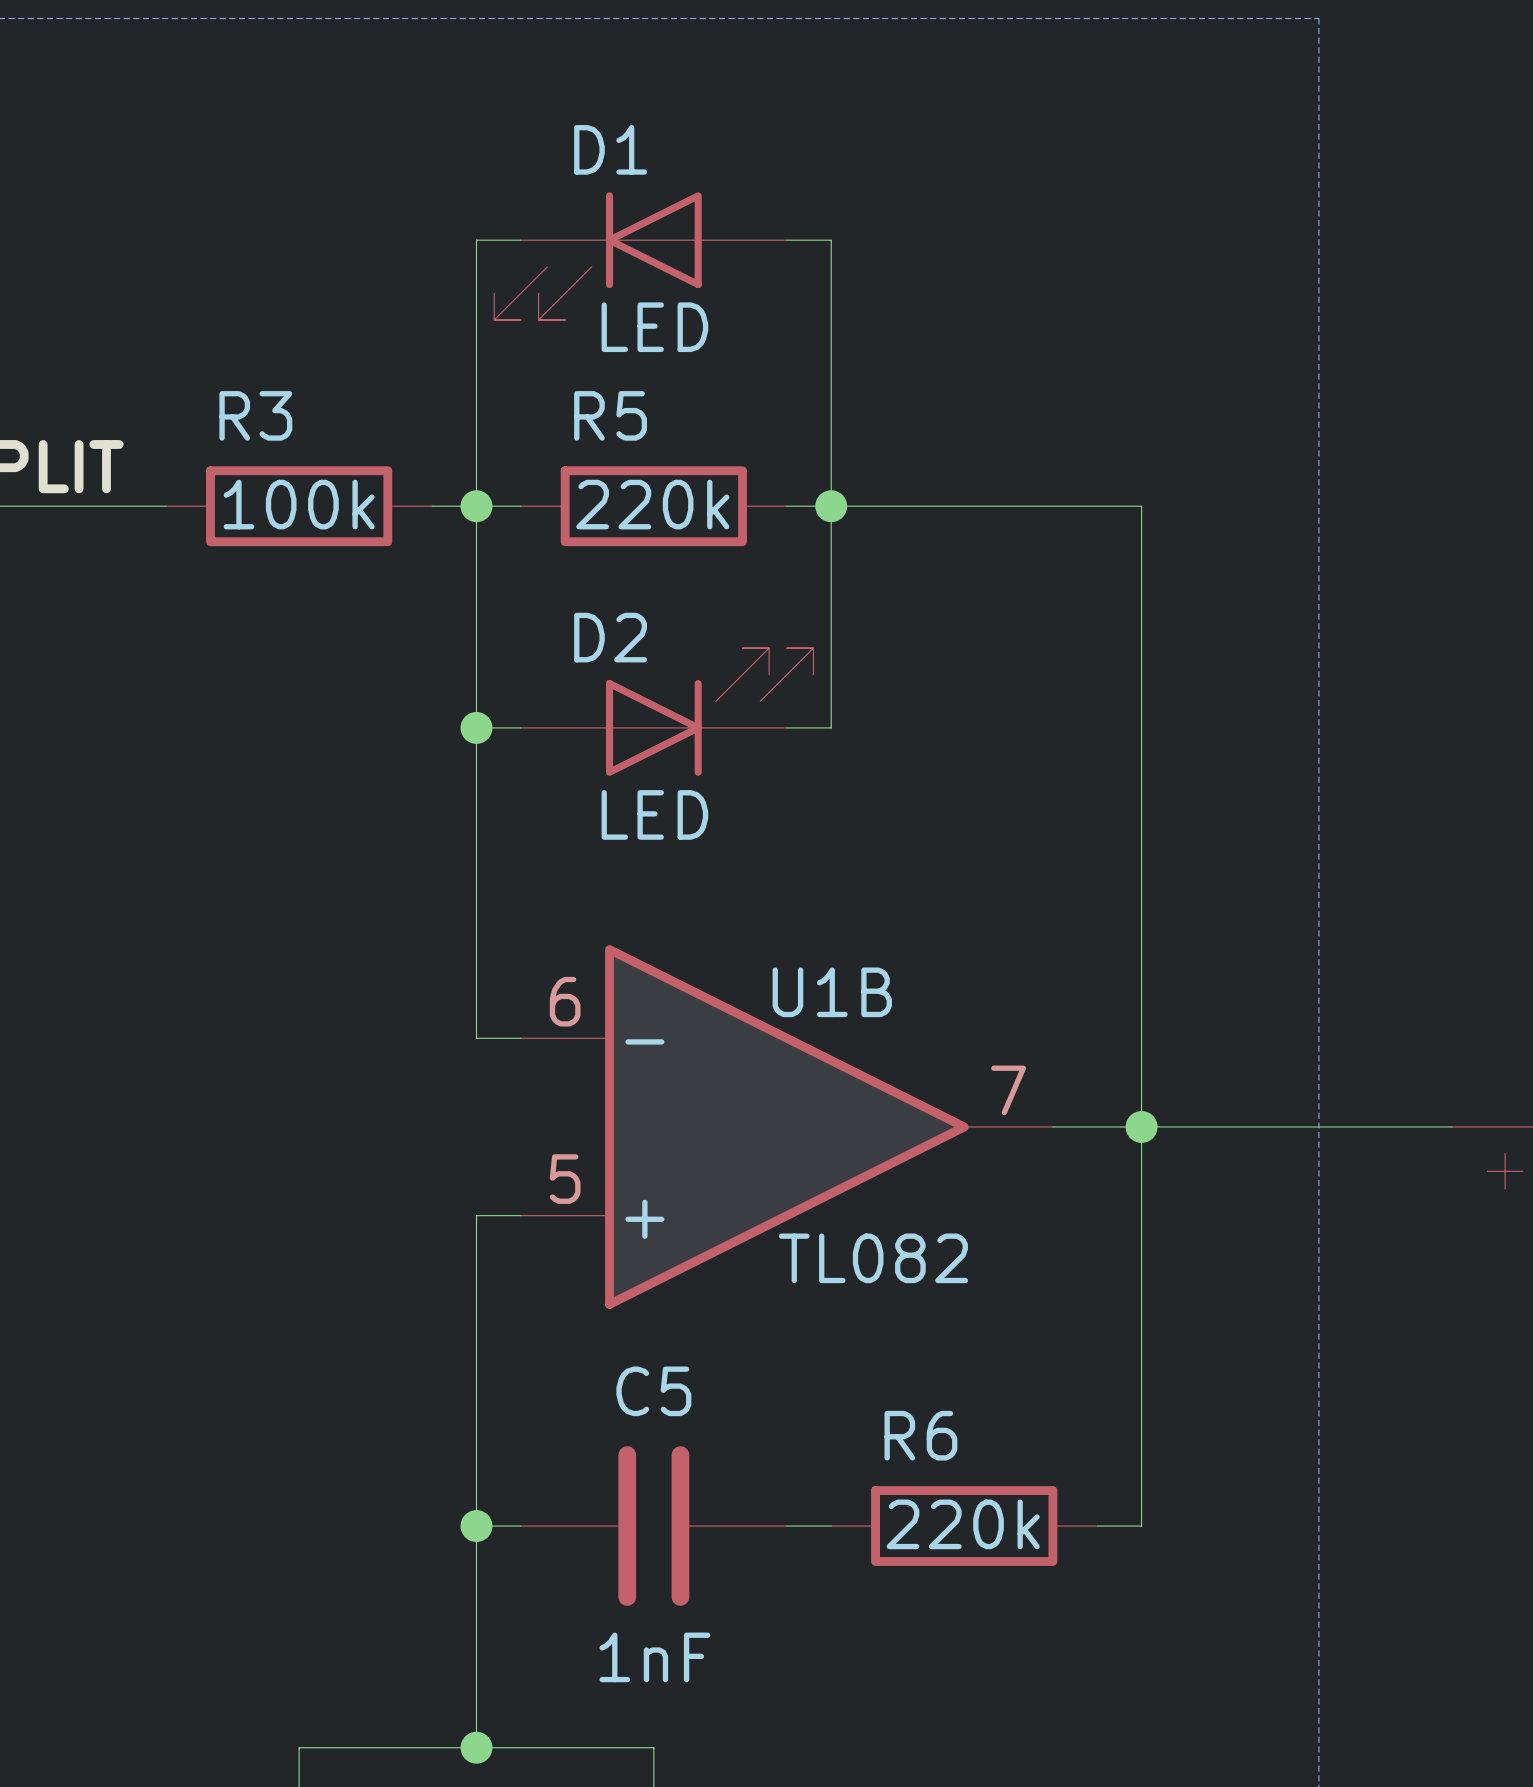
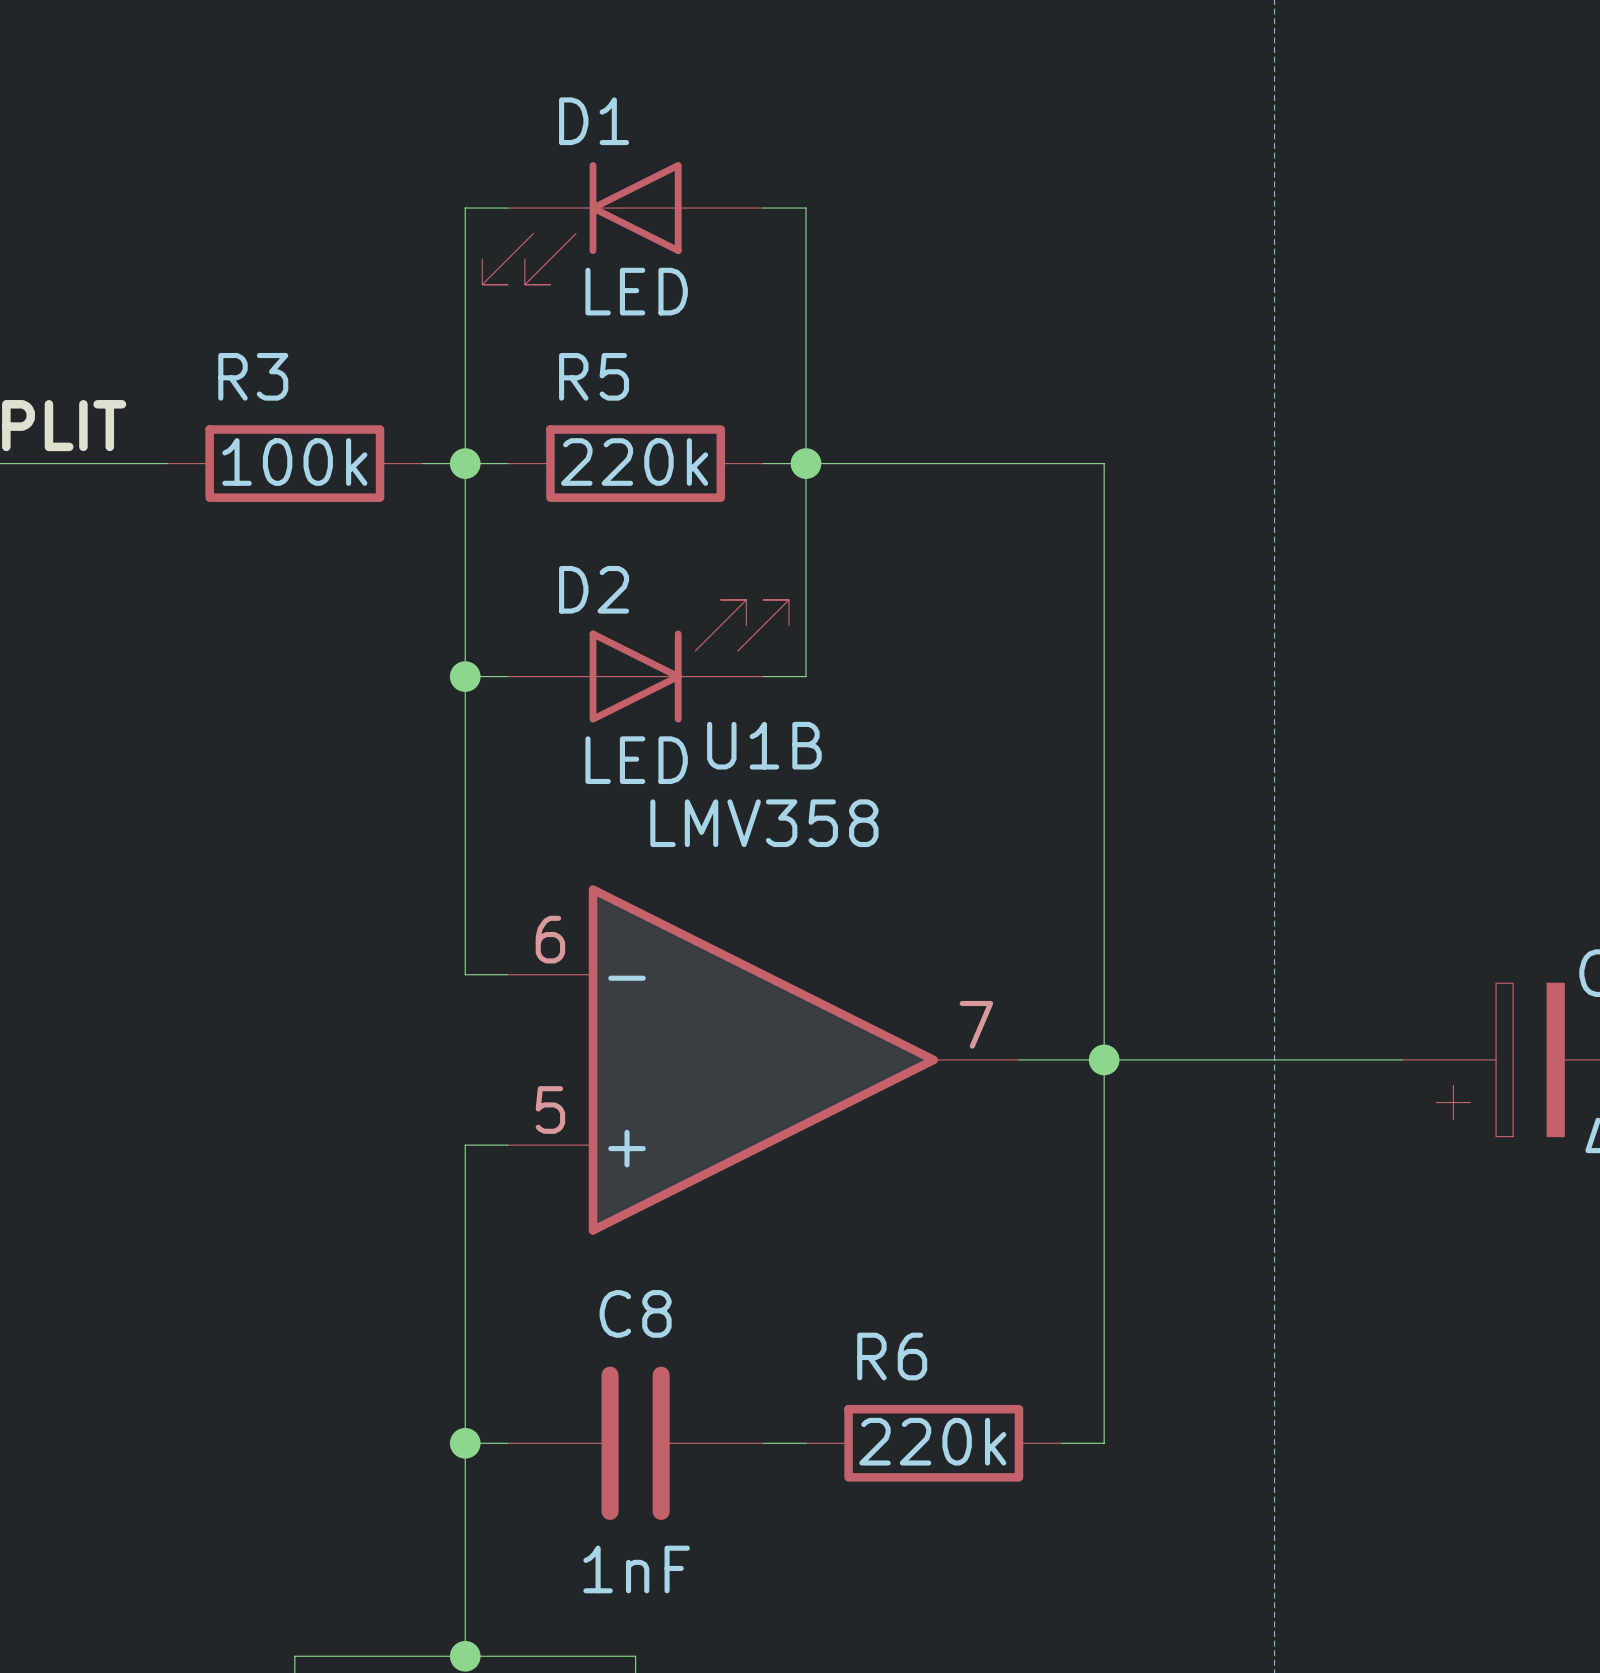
U1B name position: U1B (832, 992) -> U1B (764, 745)
U1B value: TL082 (873, 1258) -> LMV358 (764, 823)
C5 name: C5 (653, 1391) -> C8 (635, 1313)

